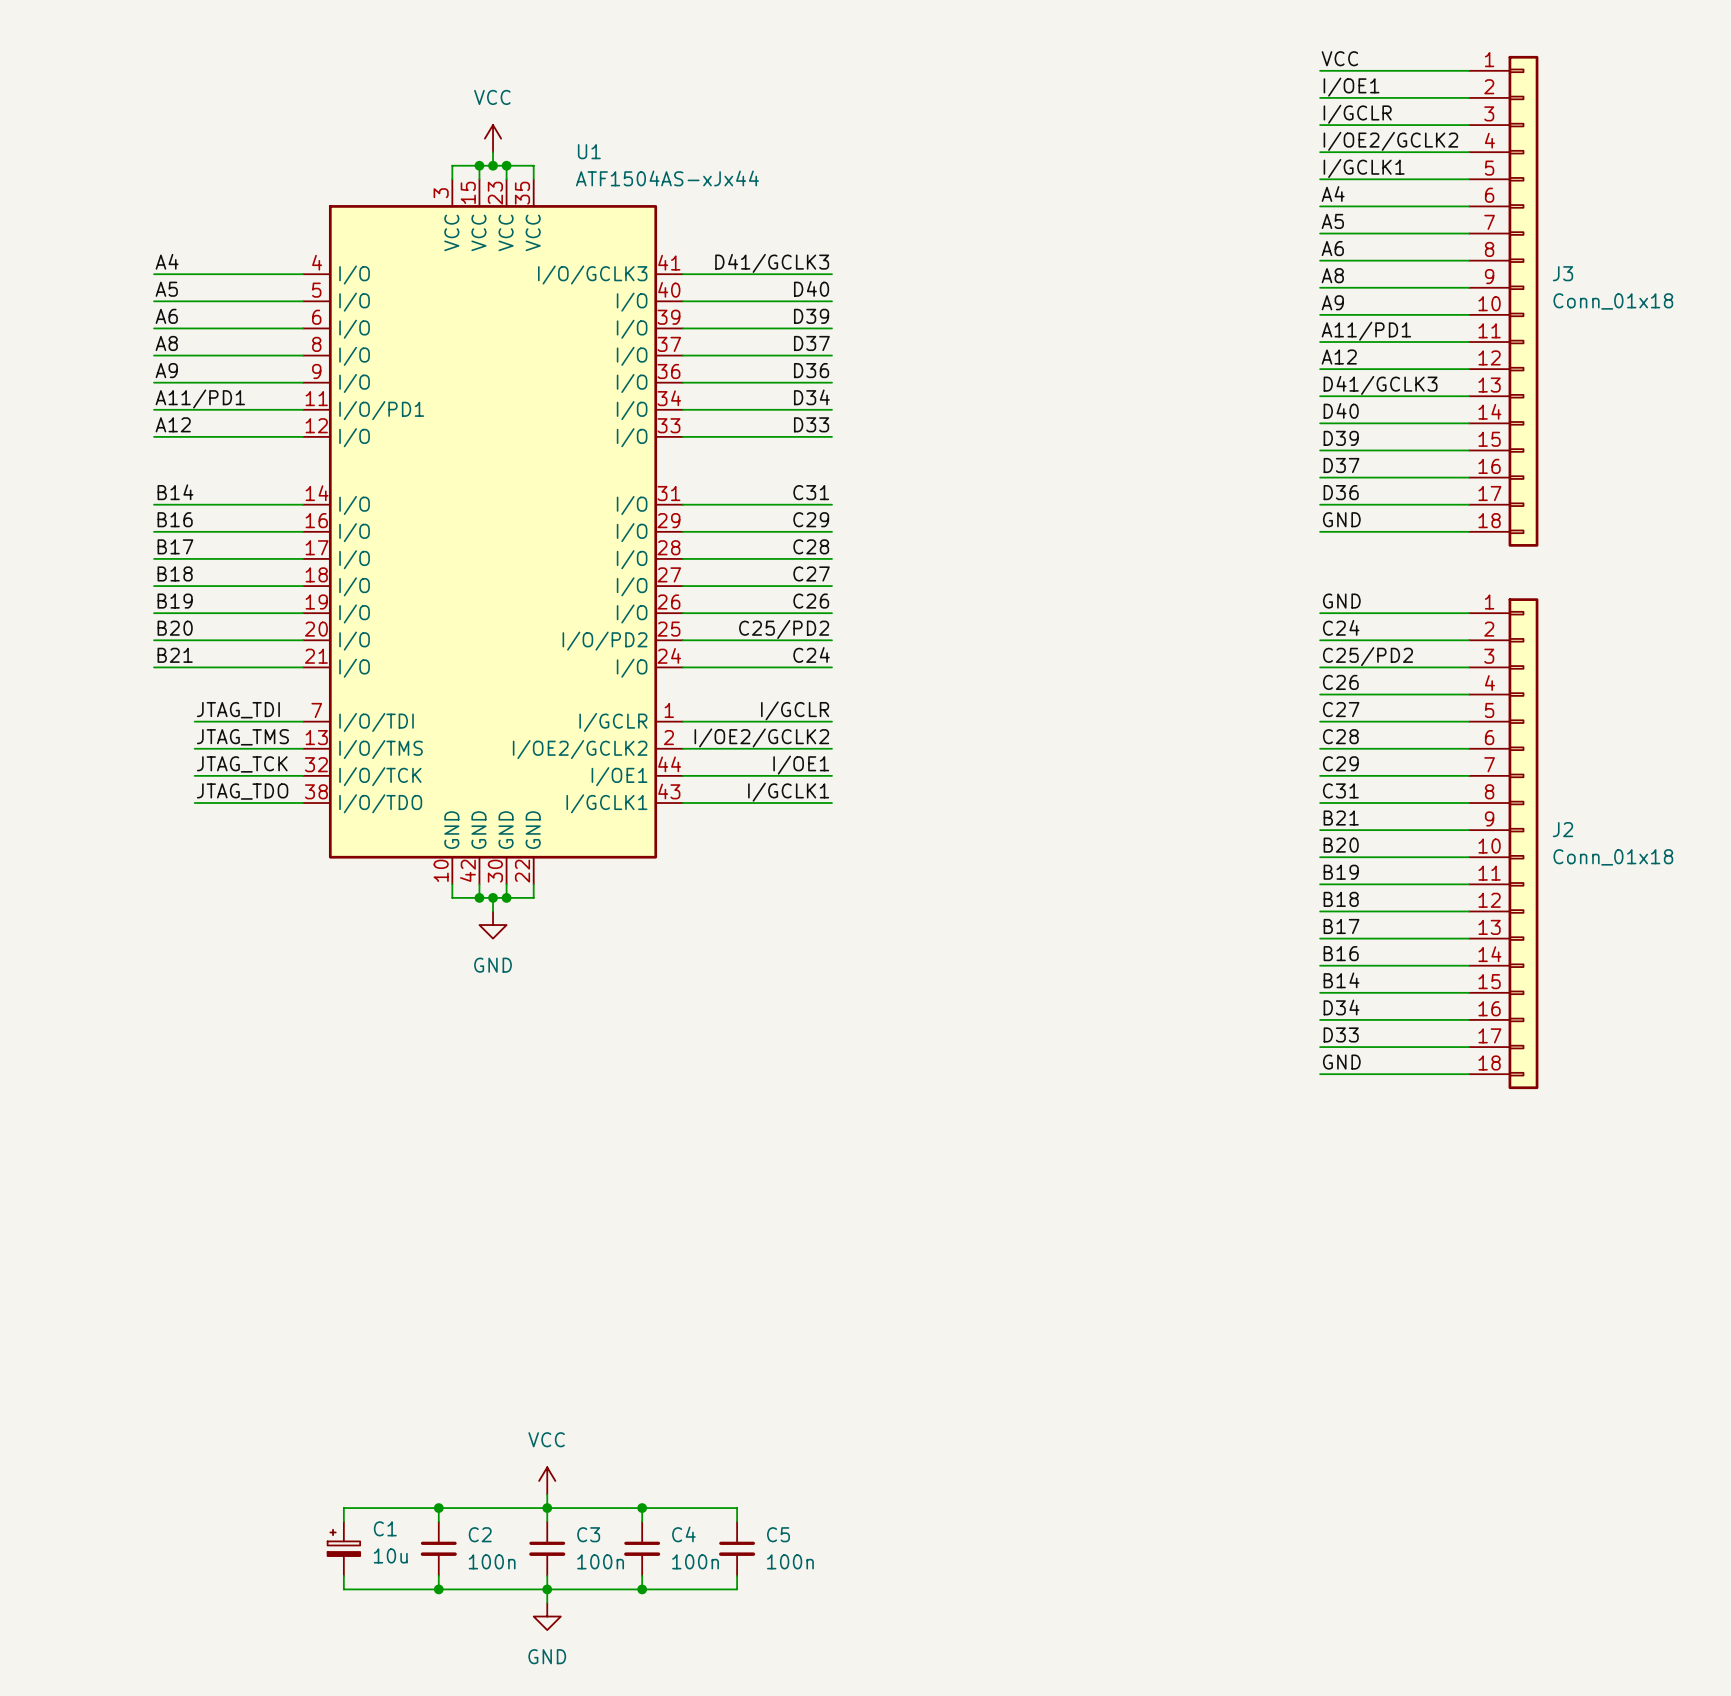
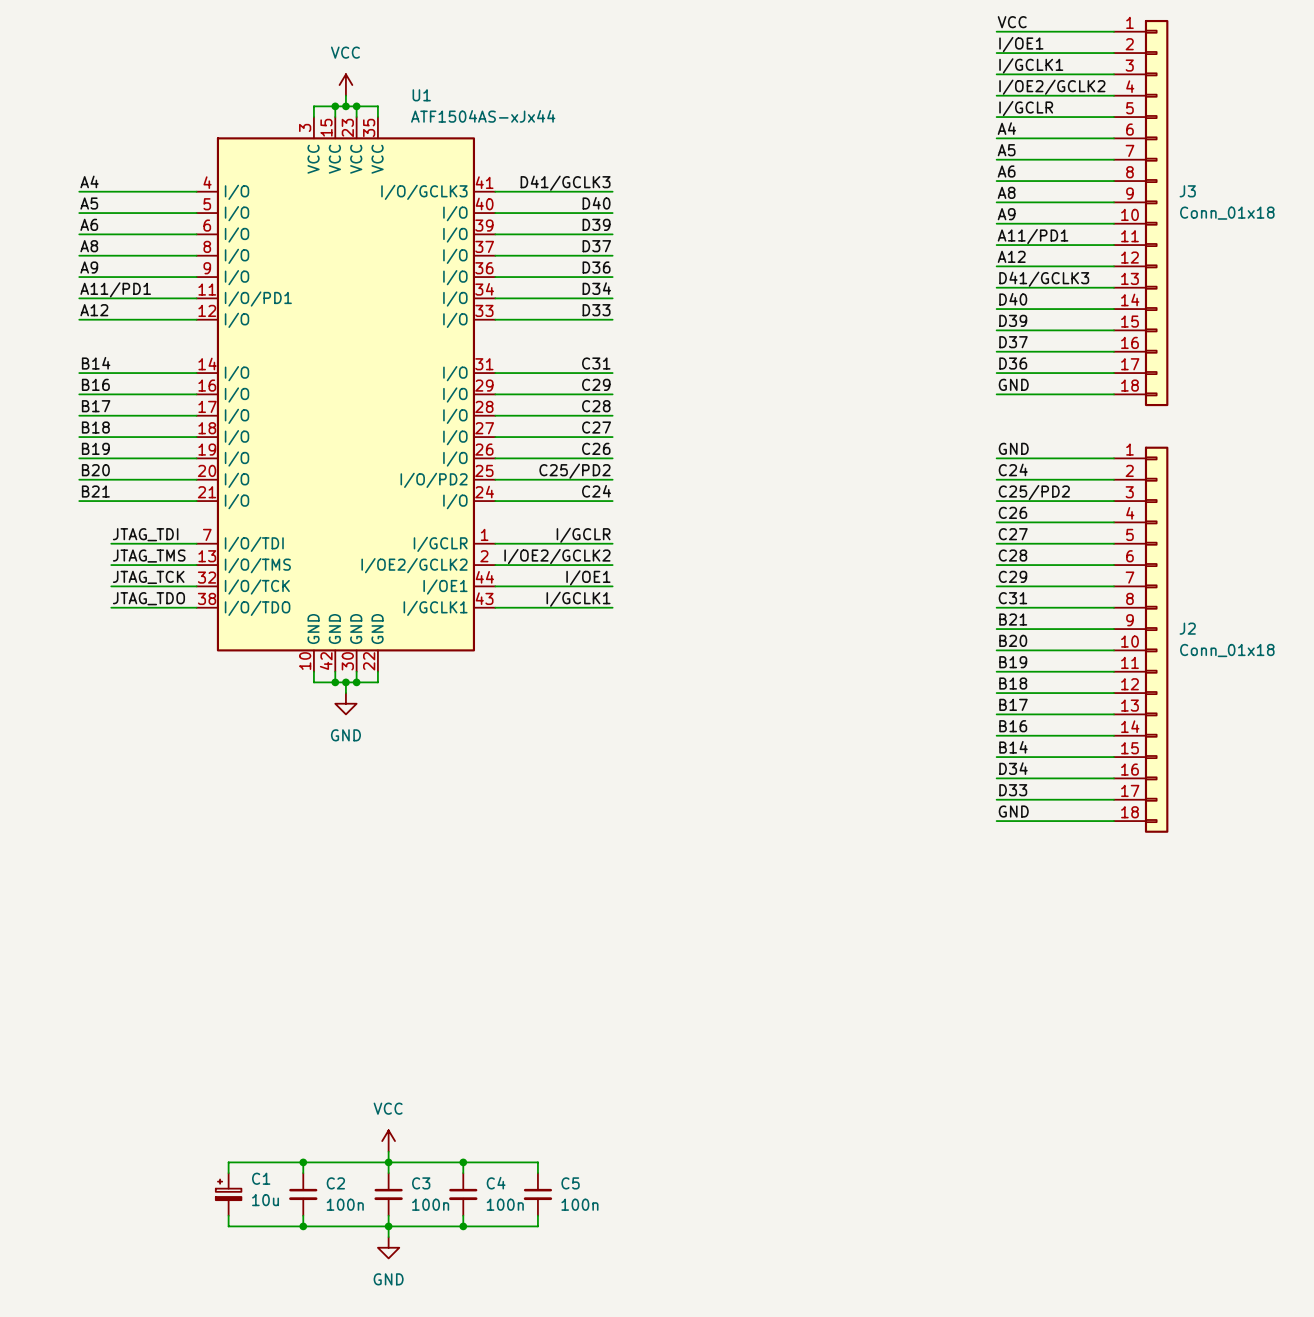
label: I/GCLR (1357, 114) -> I/GCLK1 (1031, 65)
label: I/GCLK1 (1364, 168) -> I/GCLR (1026, 108)

